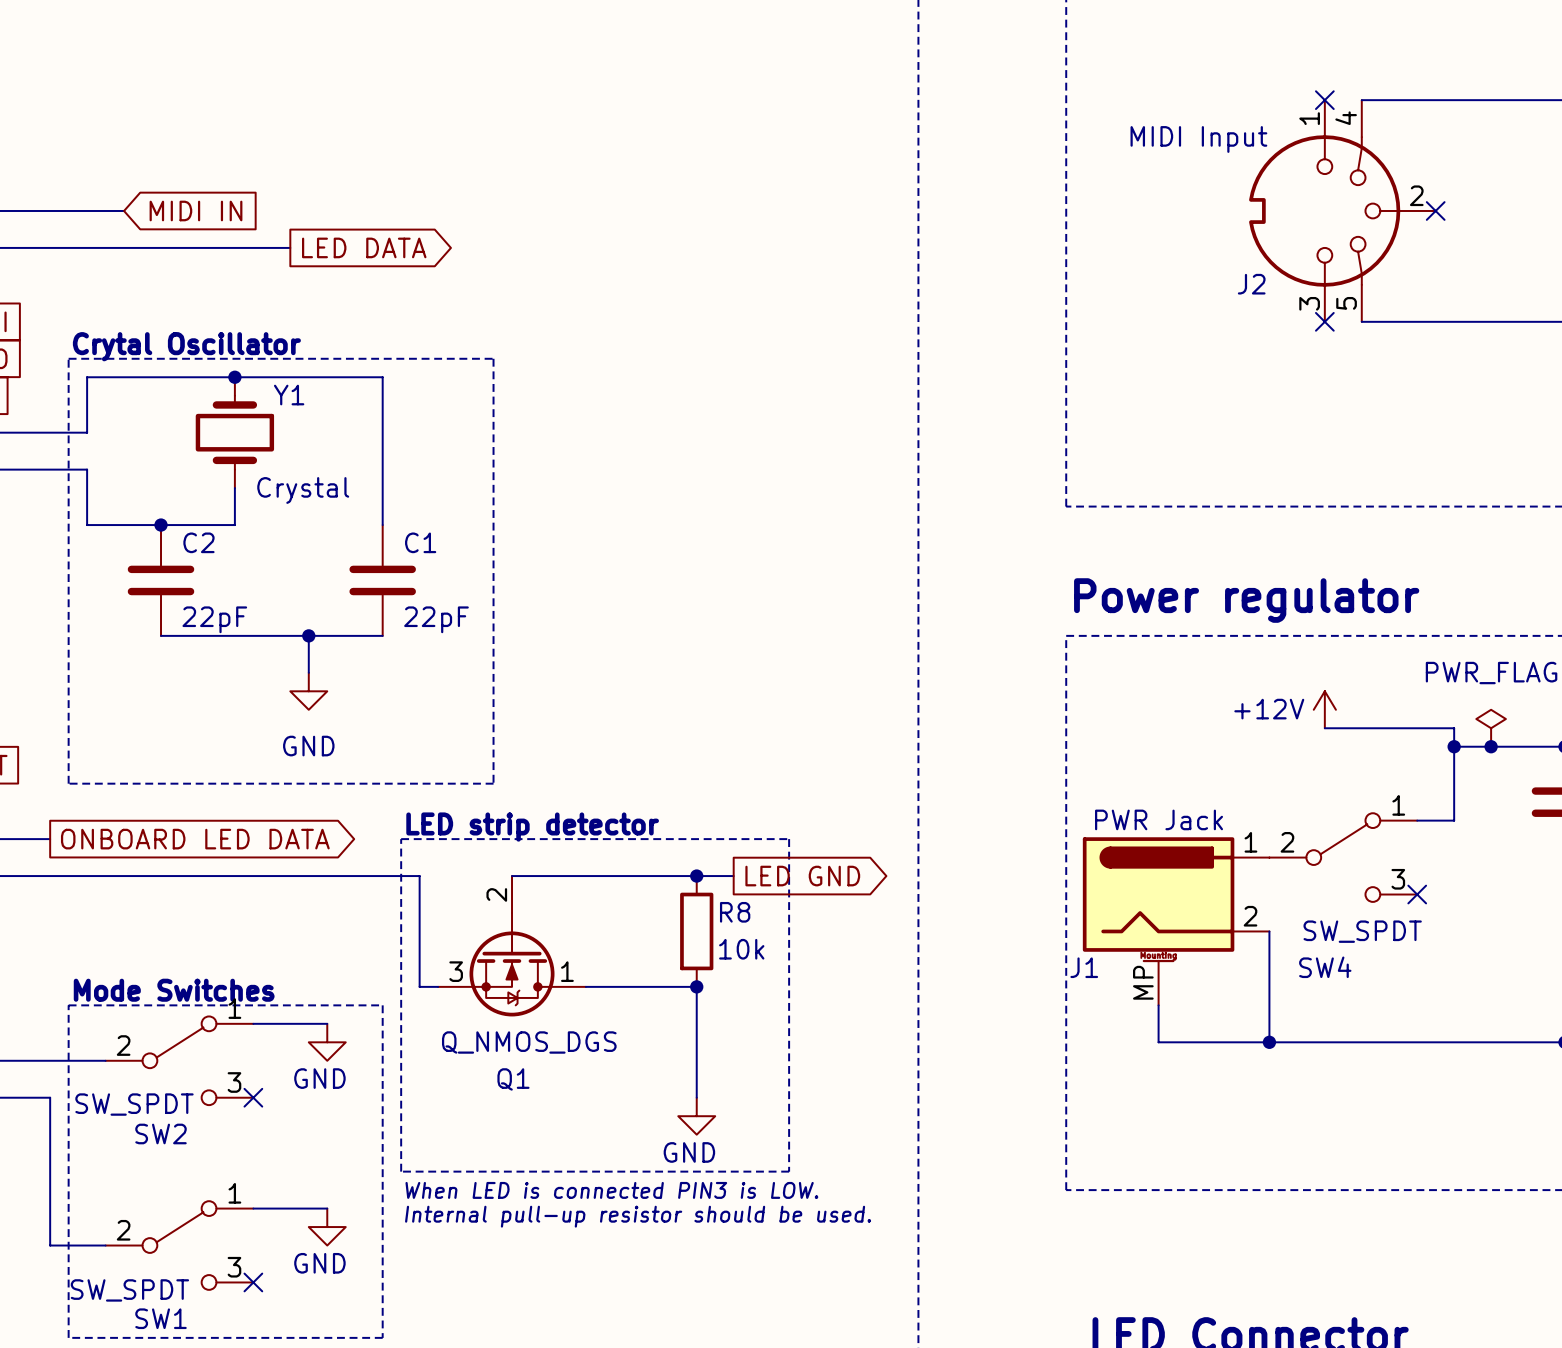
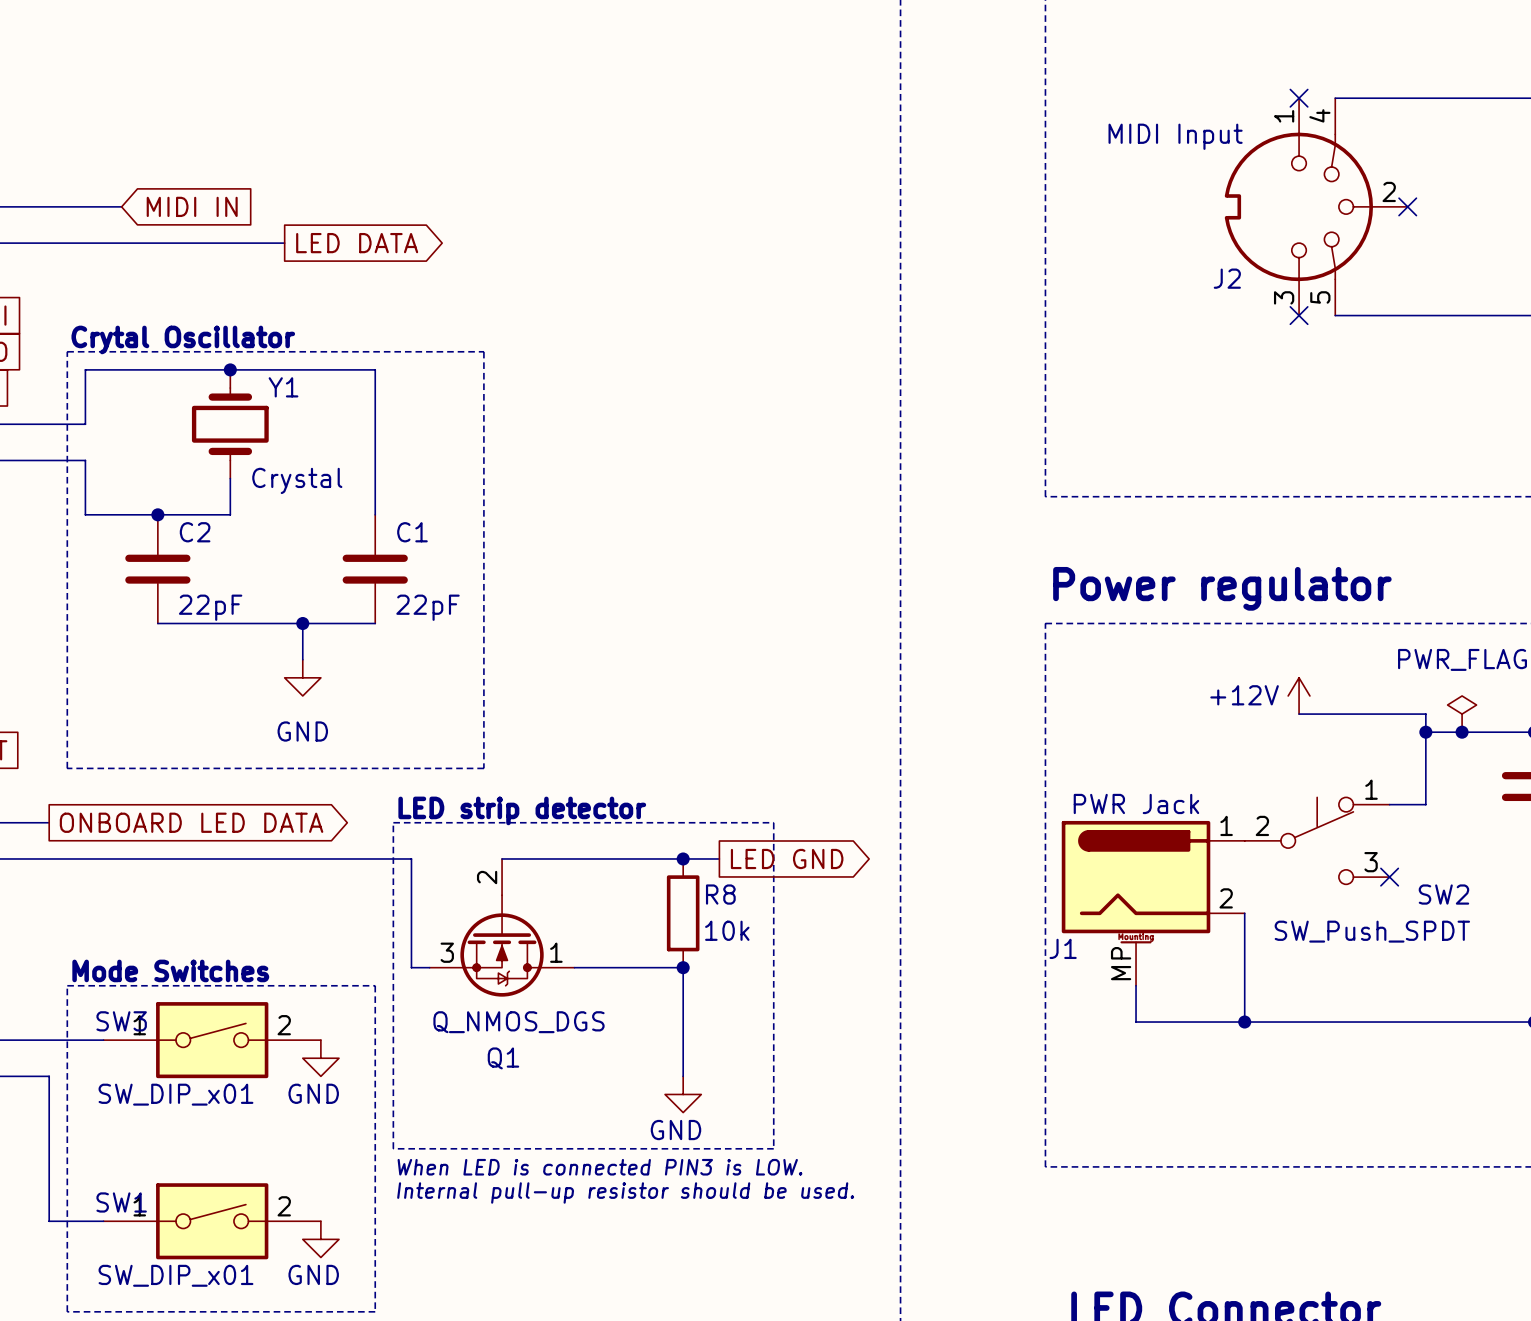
SW4: SW_SPDT (1343, 857) -> none
SW2 symbol: [105, 1016, 254, 1106] -> [1244, 797, 1390, 885]
wire: (253, 1023) (327, 1023) -> none
power symbol position: GND (327, 1042) -> GND (320, 1058)
SW3: none -> SW_DIP_x01 (212, 1040)
no-connect mark: (253, 1097) -> none
SW2 value: SW_SPDT (134, 1104) -> SW_Push_SPDT (1372, 931)
SW2 name position: SW2 (161, 1133) -> SW2 (1443, 894)
SW1 symbol: [105, 1201, 254, 1290] -> [103, 1183, 321, 1260]
wire: (253, 1208) (327, 1208) -> none
power symbol position: GND (327, 1227) -> GND (320, 1239)
no-connect mark: (253, 1282) -> none
SW1 value: SW_SPDT (129, 1290) -> SW_DIP_x01 (175, 1275)
SW1 name position: SW1 (161, 1318) -> SW1 (121, 1202)

